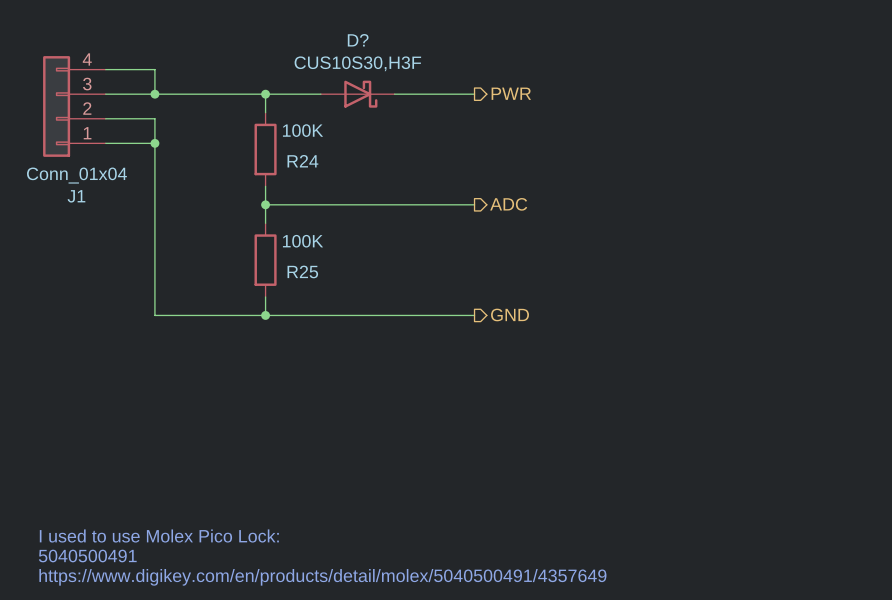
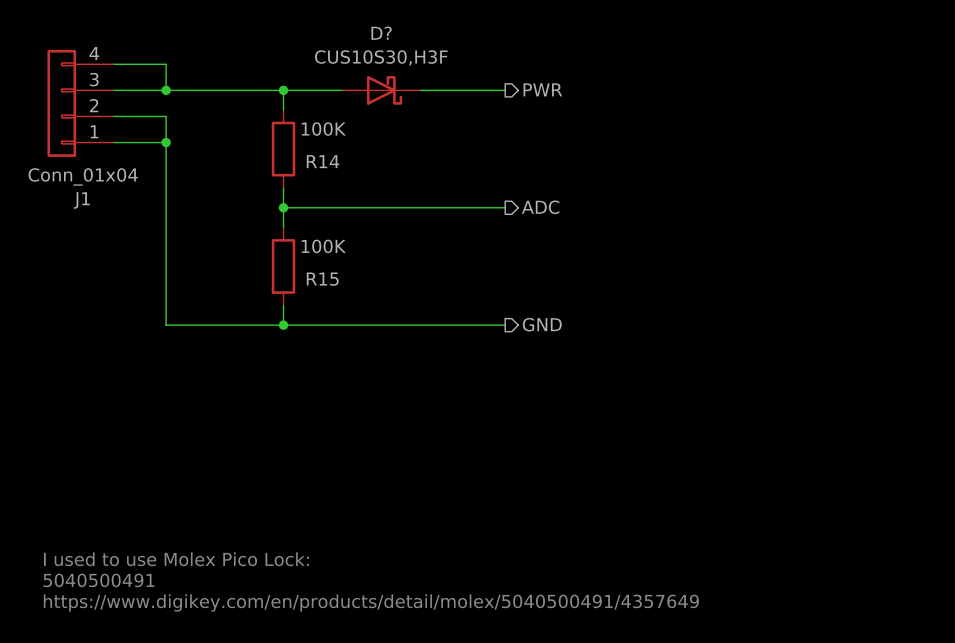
R24 name: R24 (302, 161) -> R14 (323, 161)
R25 name: R25 (302, 271) -> R15 (322, 279)

